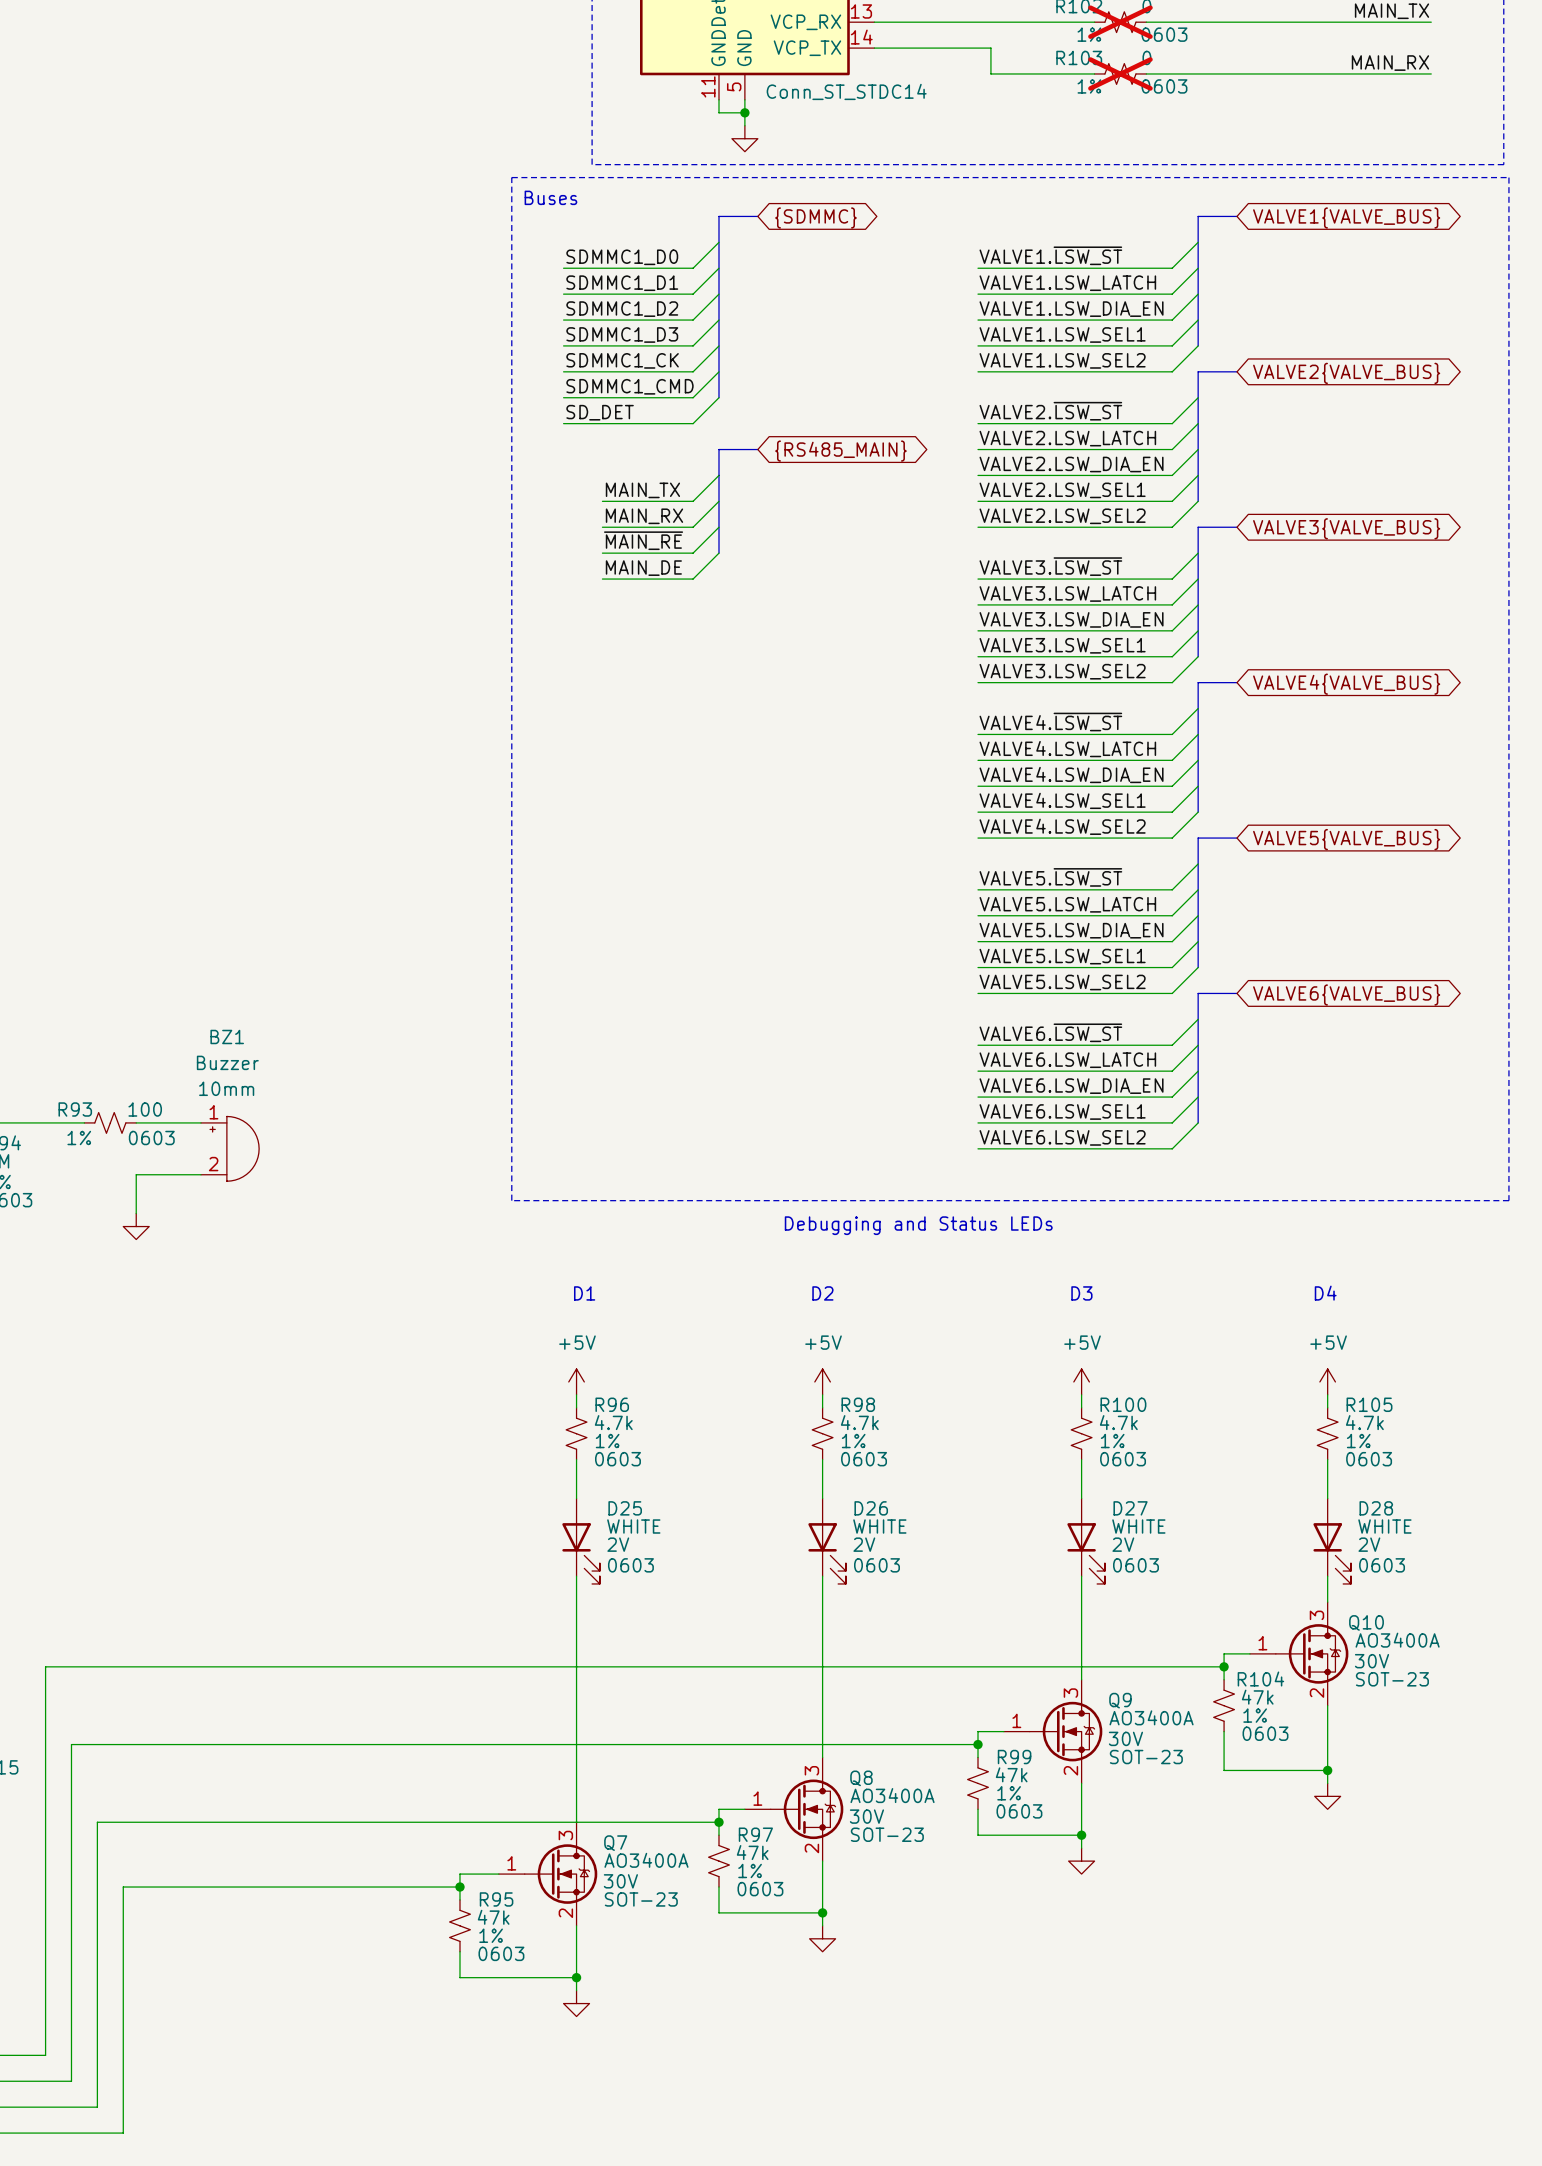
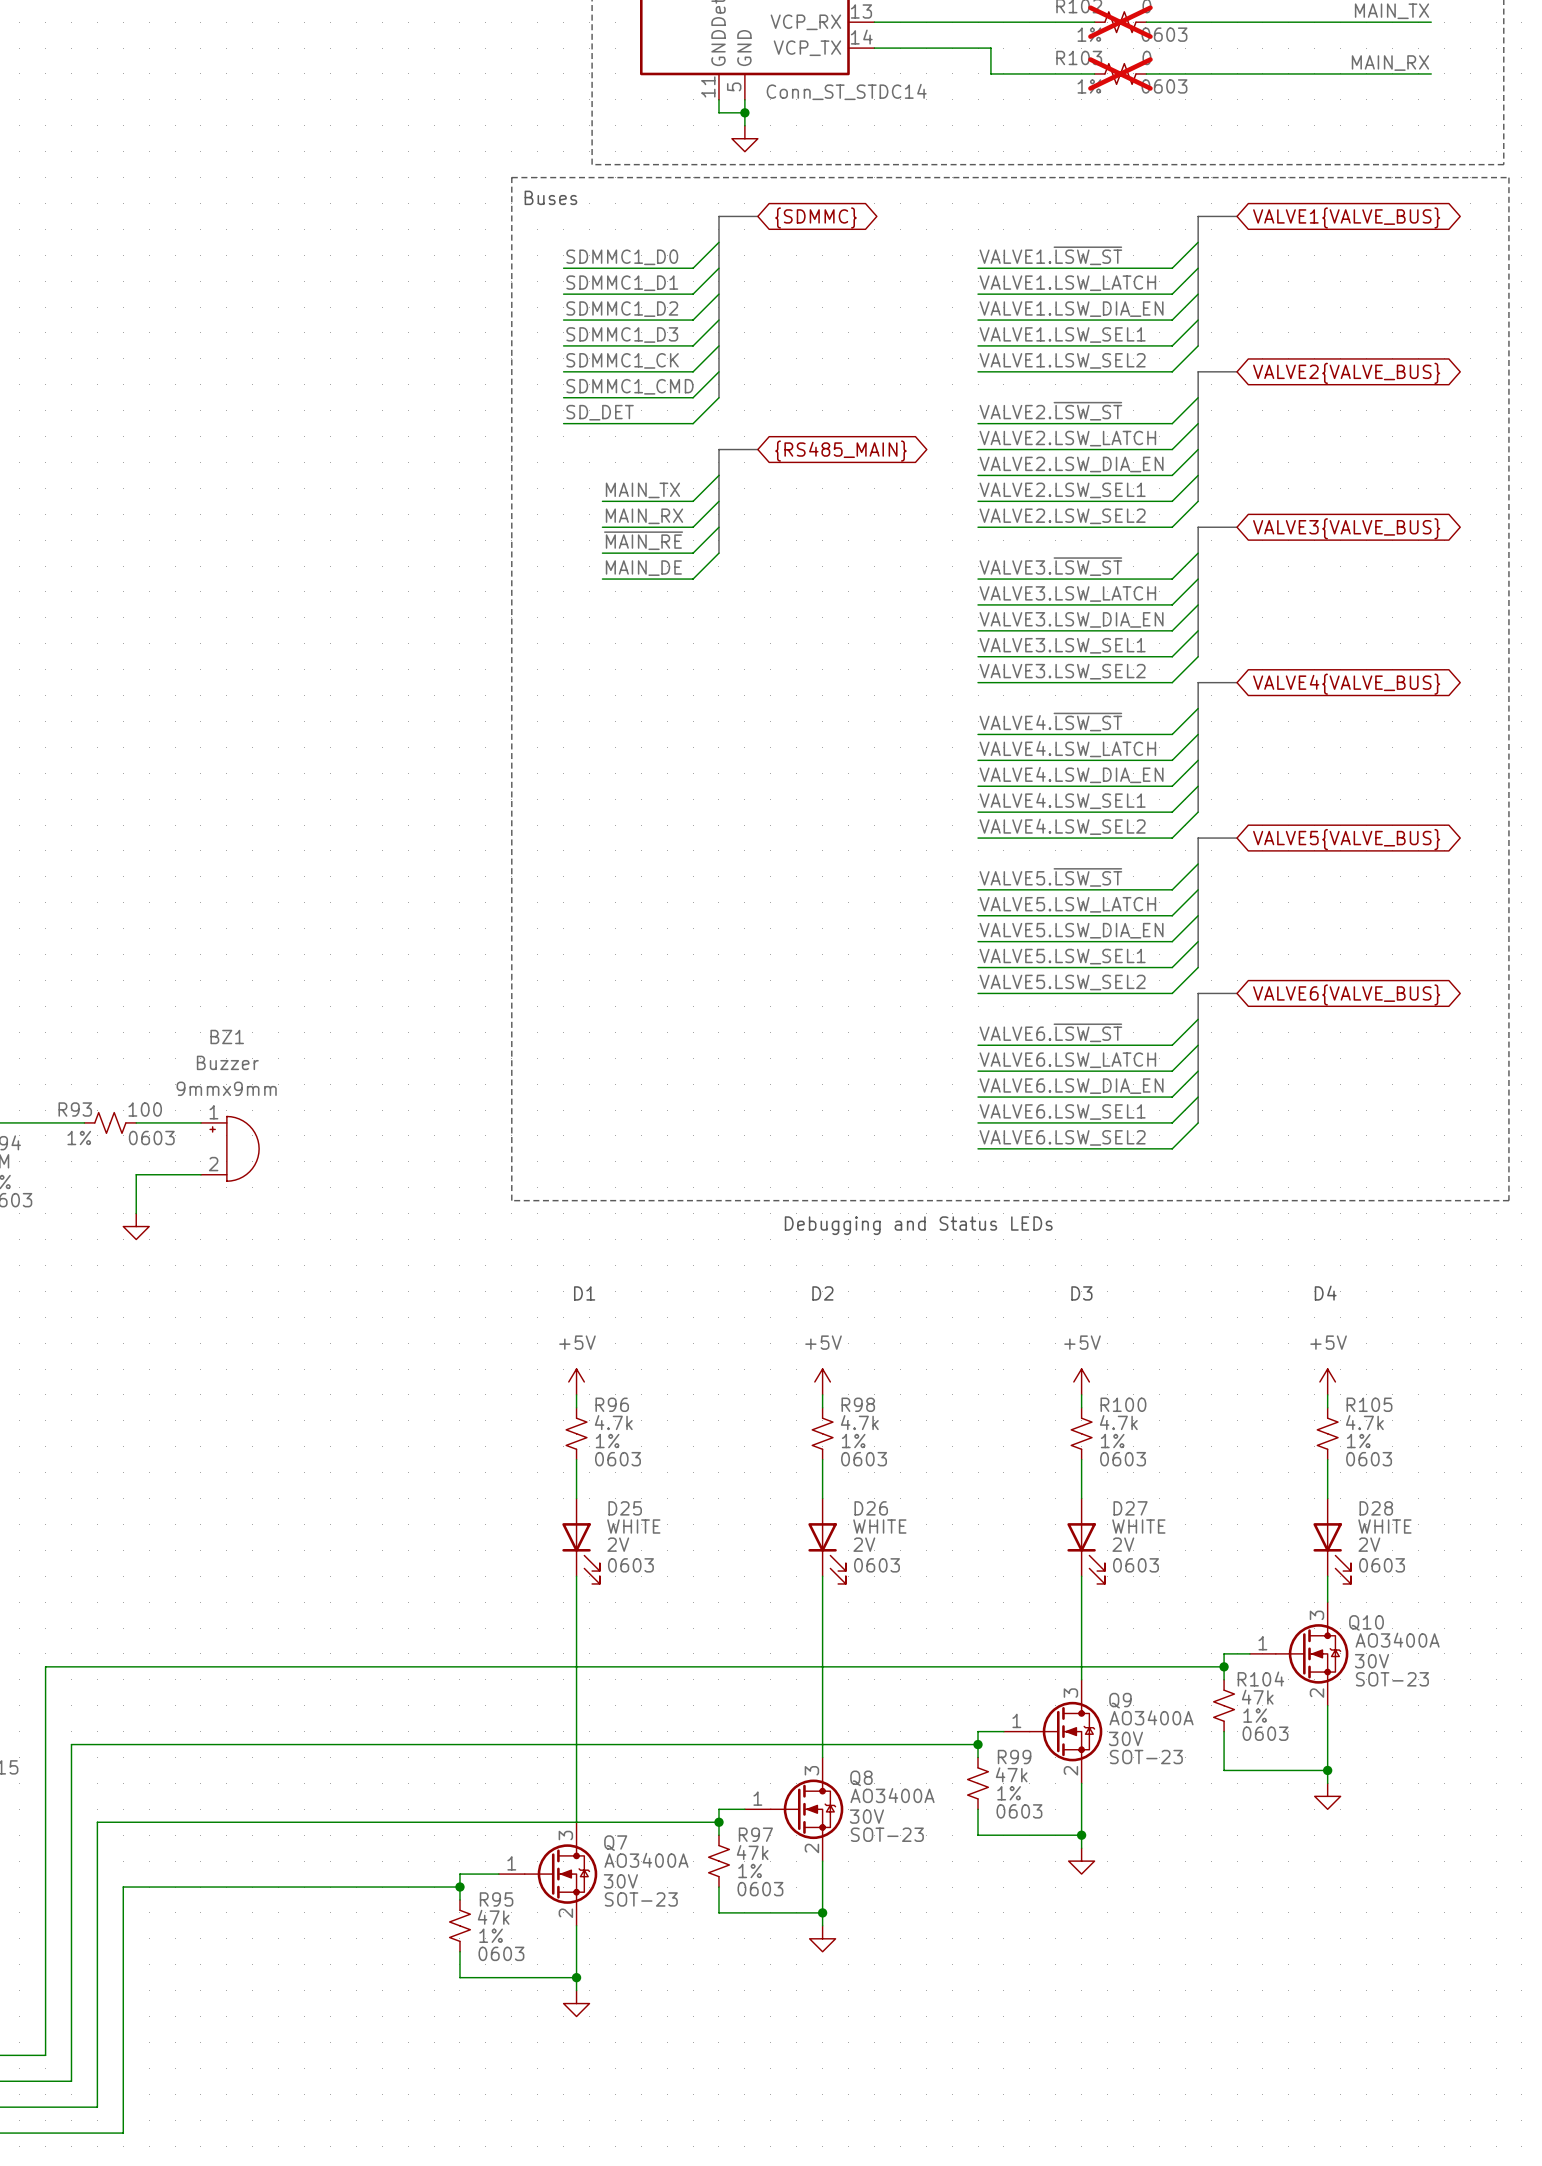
BZ1 text: 10mm (226, 1088) -> 9mmx9mm (226, 1088)

